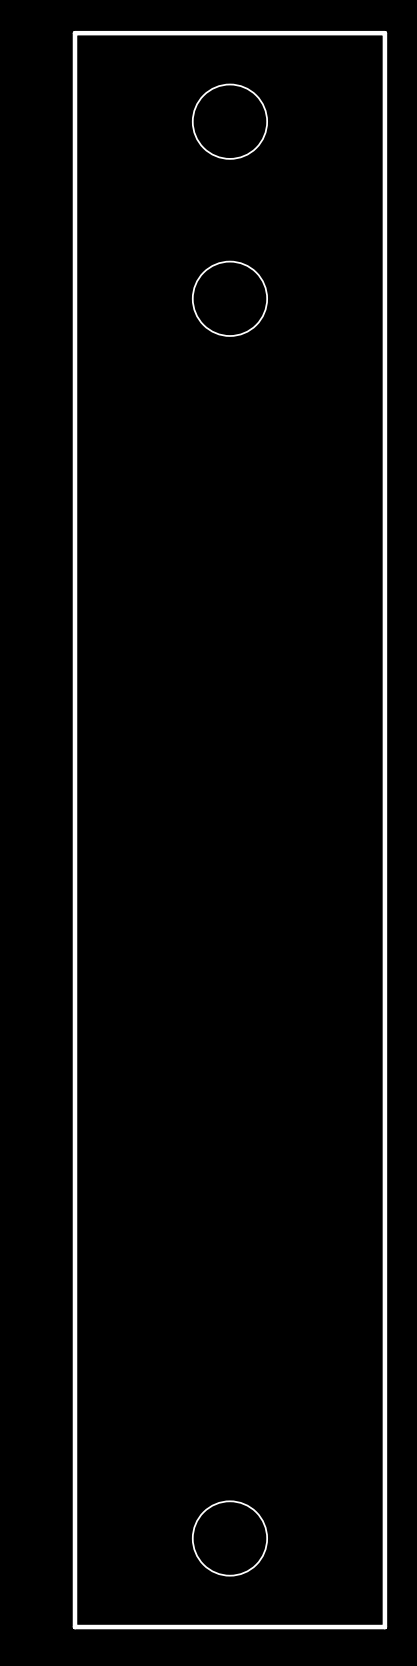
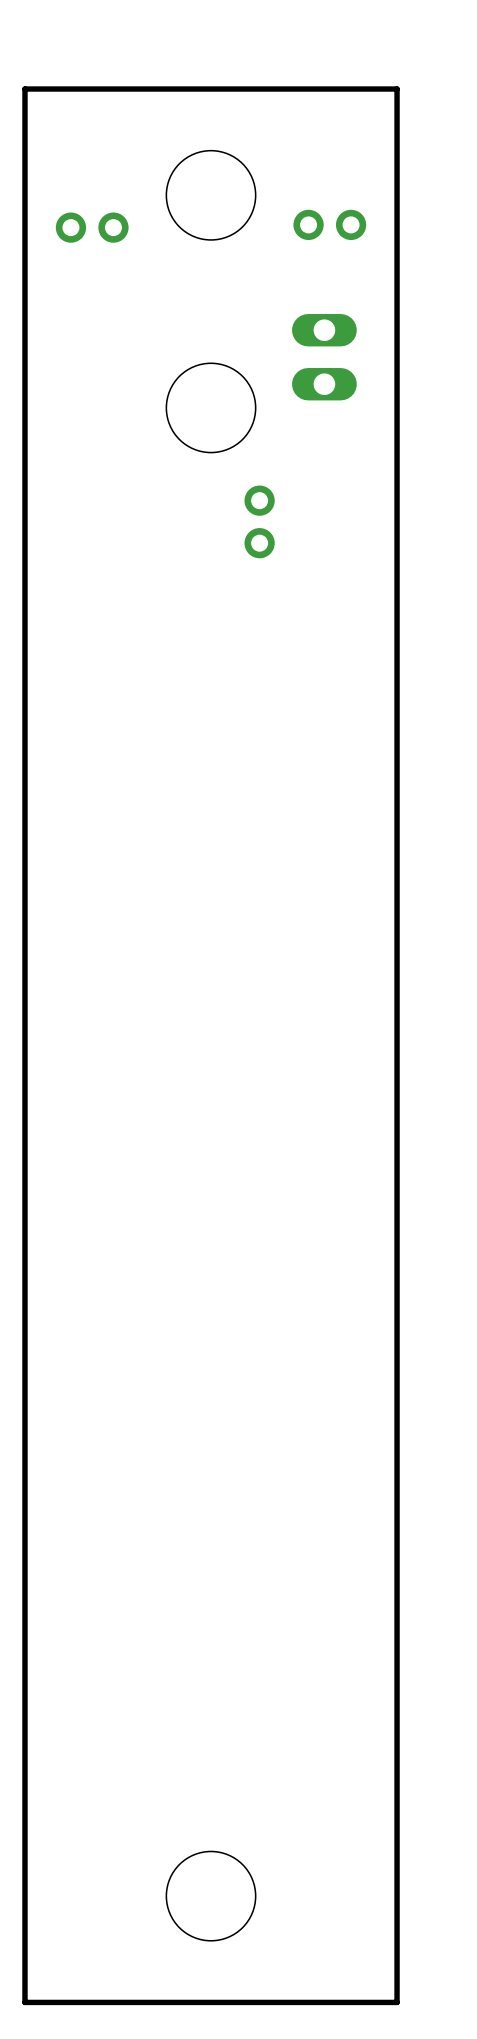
part: none -> (329, 224)
part: none -> (92, 227)
part: none -> (324, 357)
part: none -> (259, 521)

